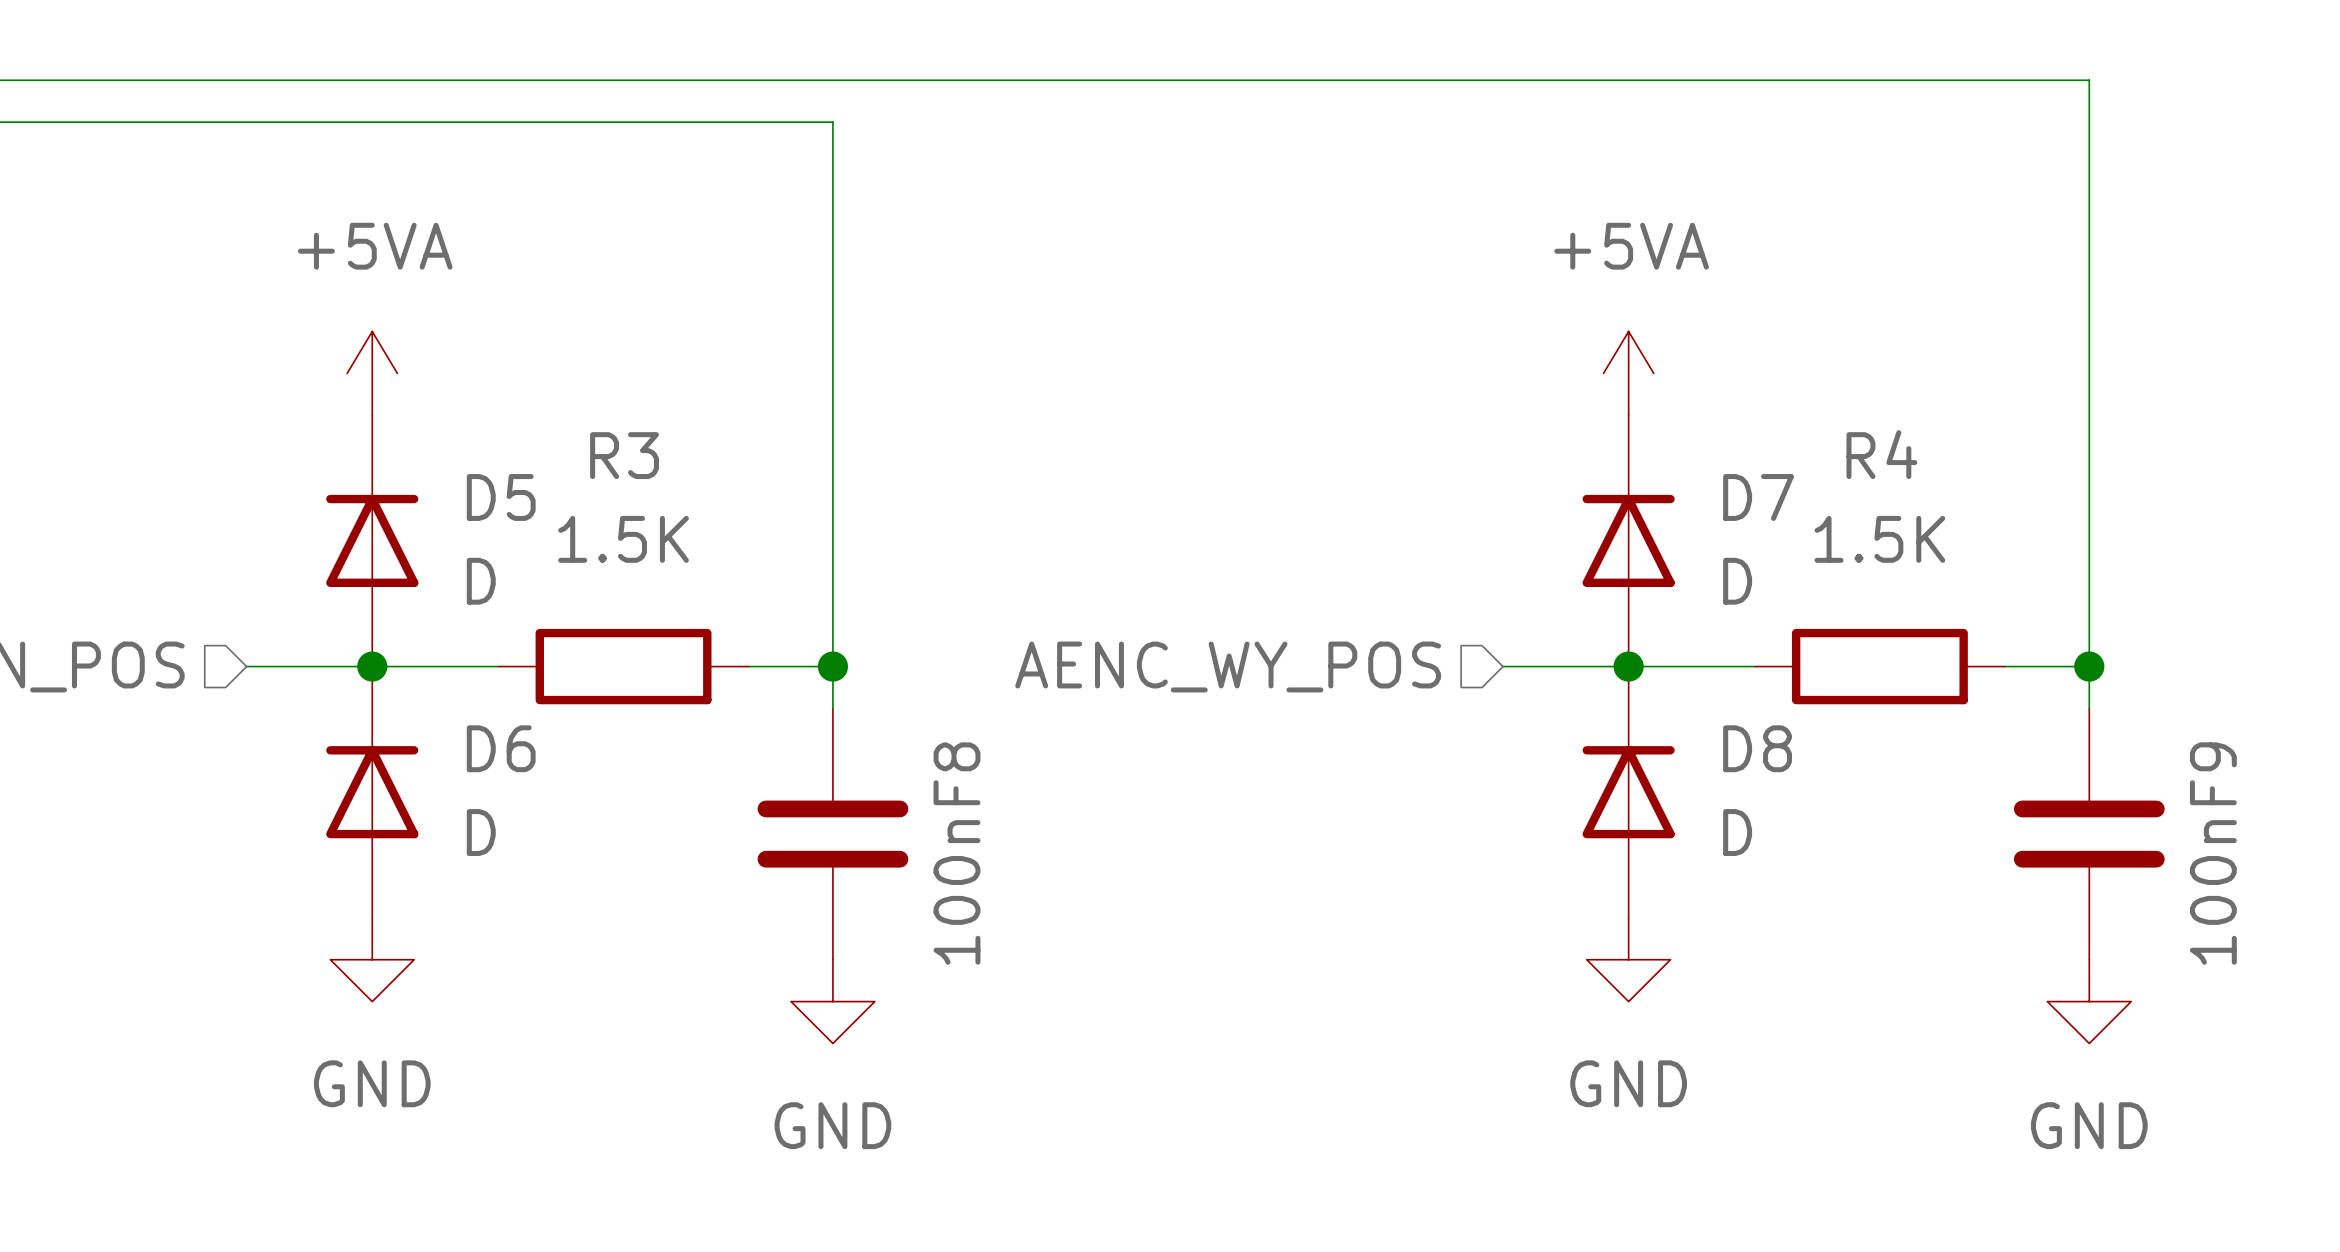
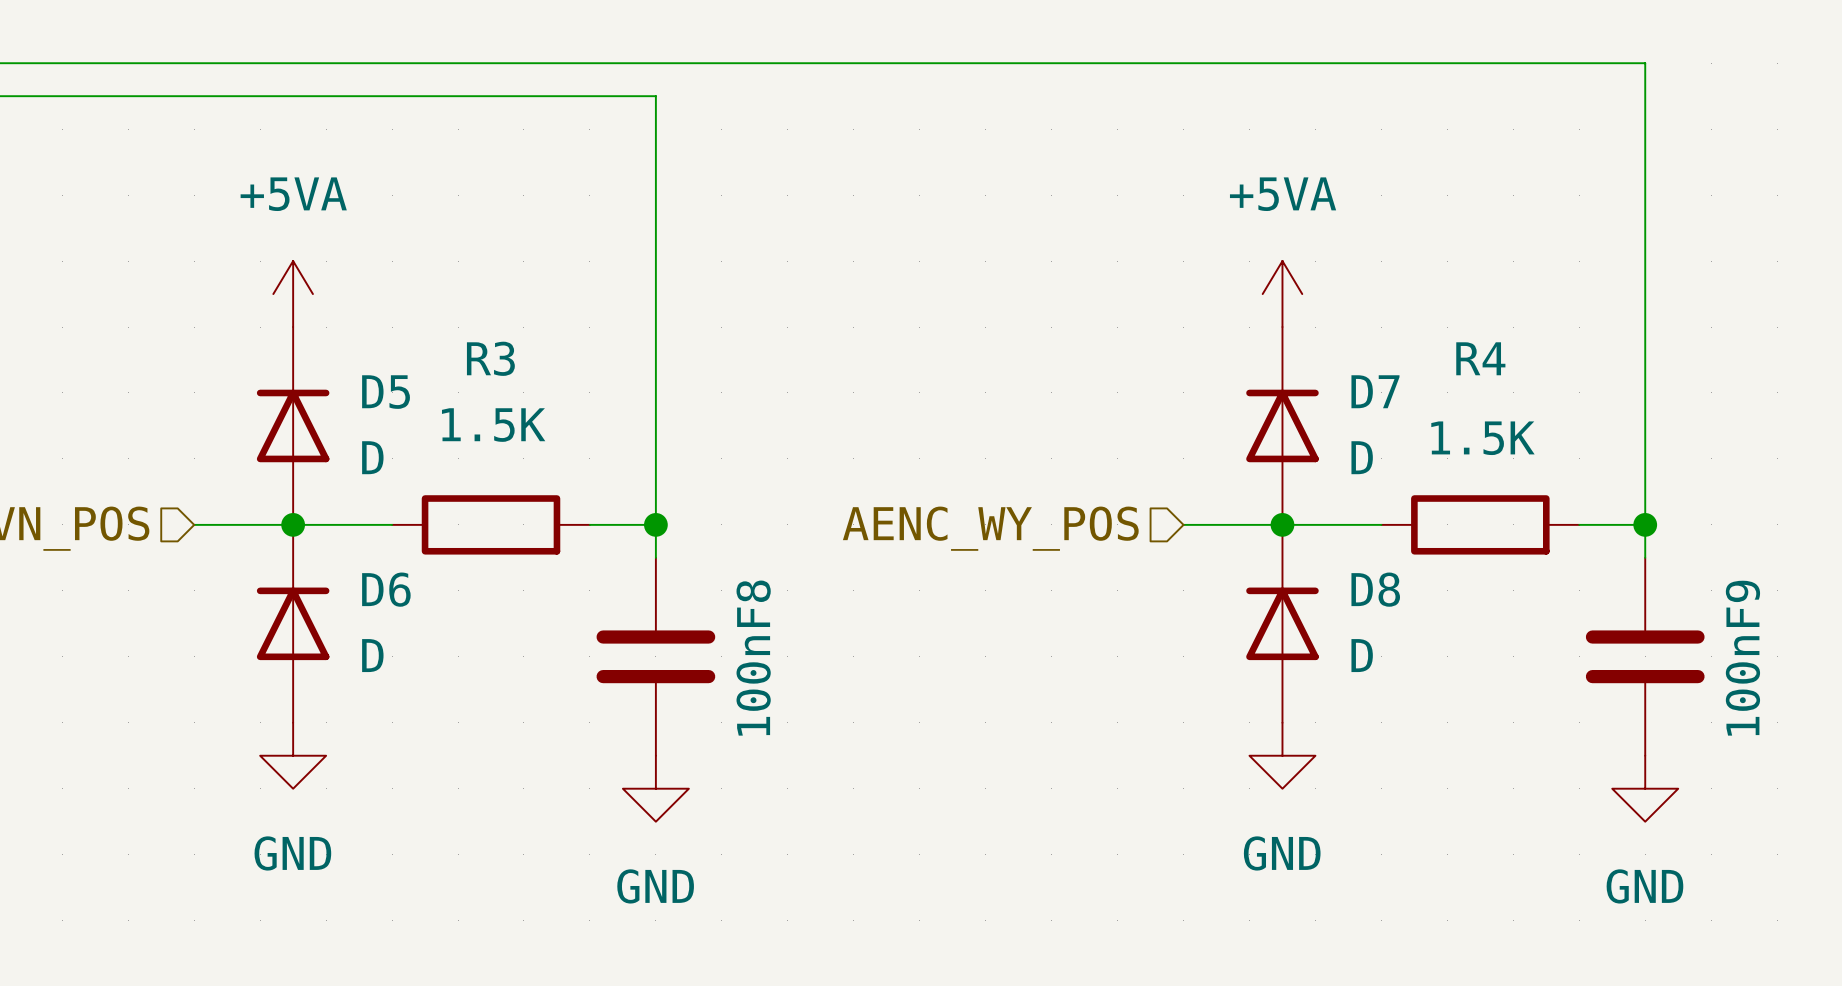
R4 value position: 1.5K (1879, 539) -> 1.5K (1482, 438)

